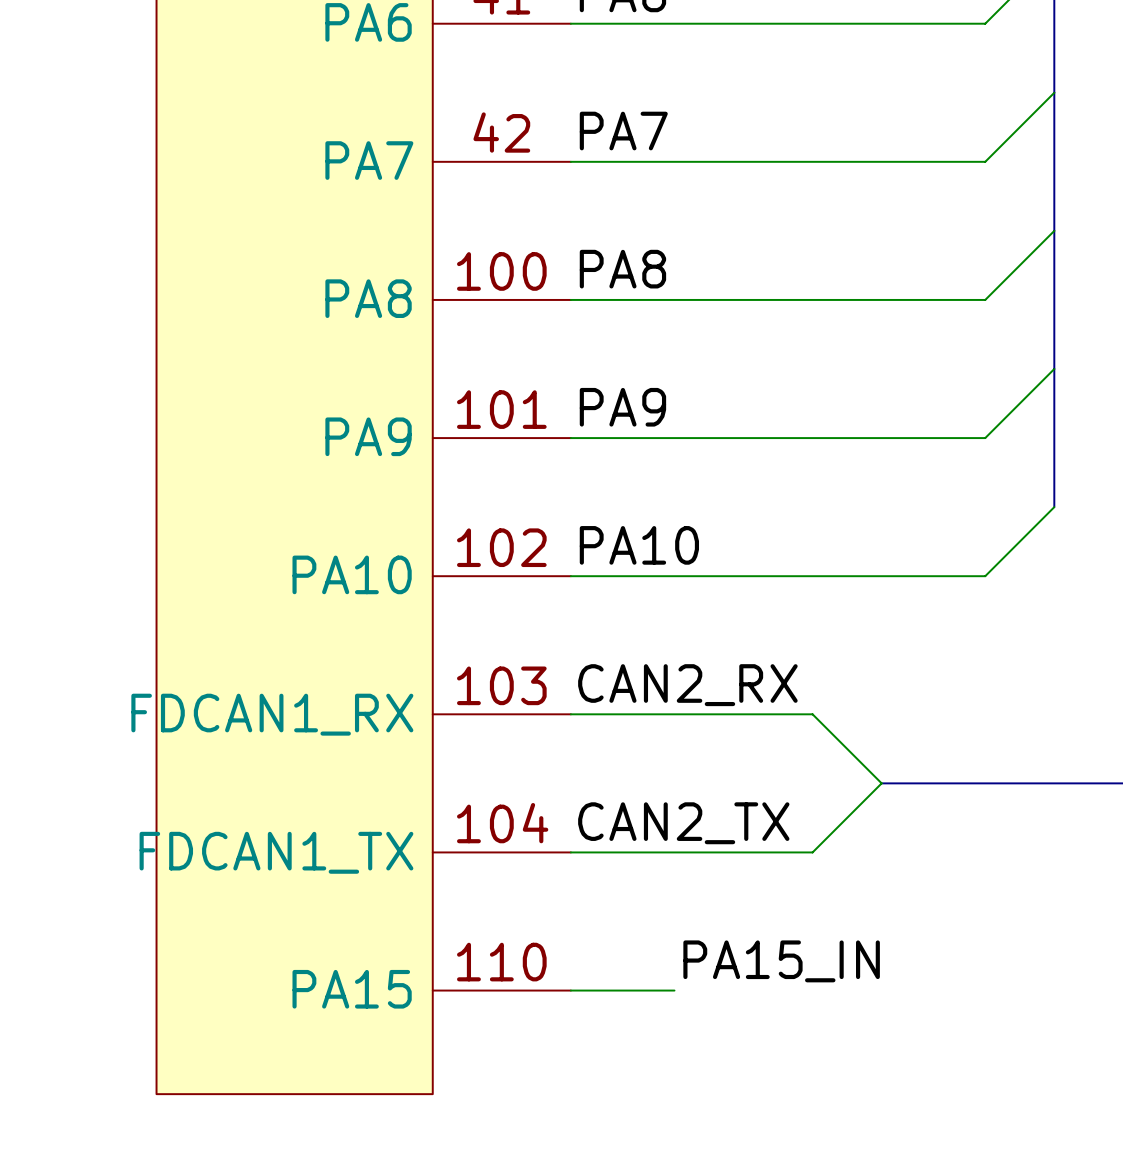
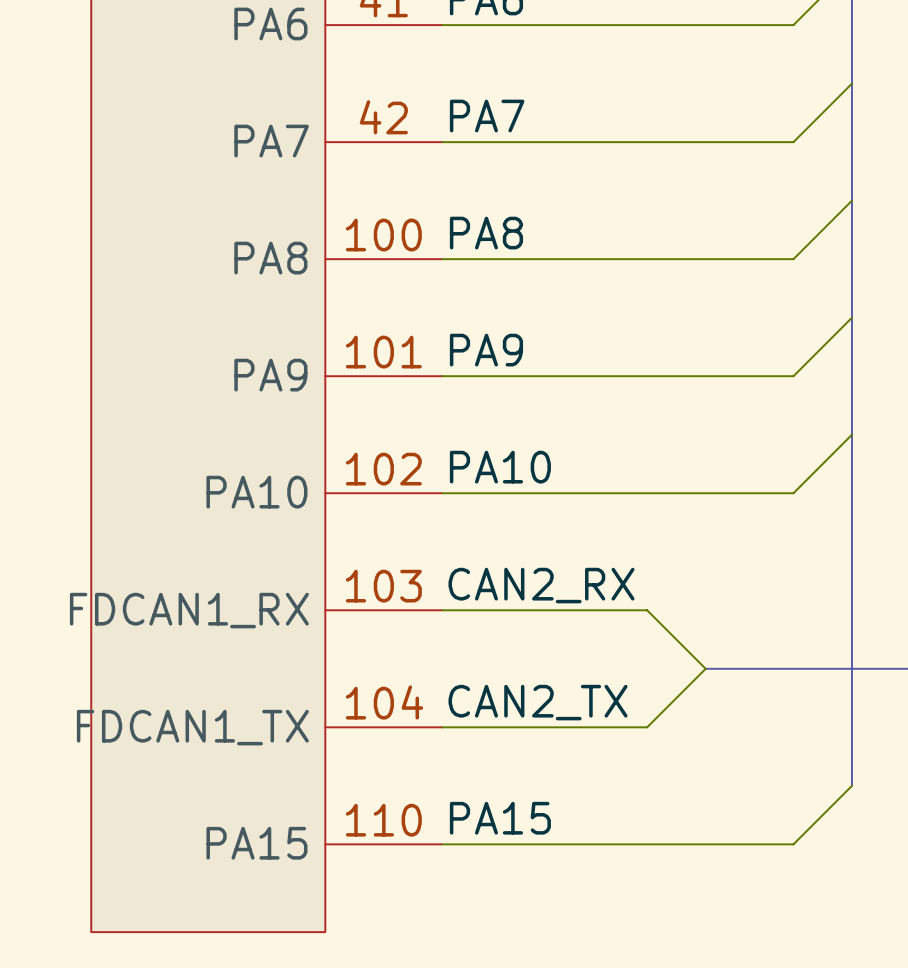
bus: none -> (851, 434) (851, 785)
wire: none -> (851, 785) (793, 844) (530, 844)
label: PA15_IN (781, 961) -> PA15 (500, 818)

